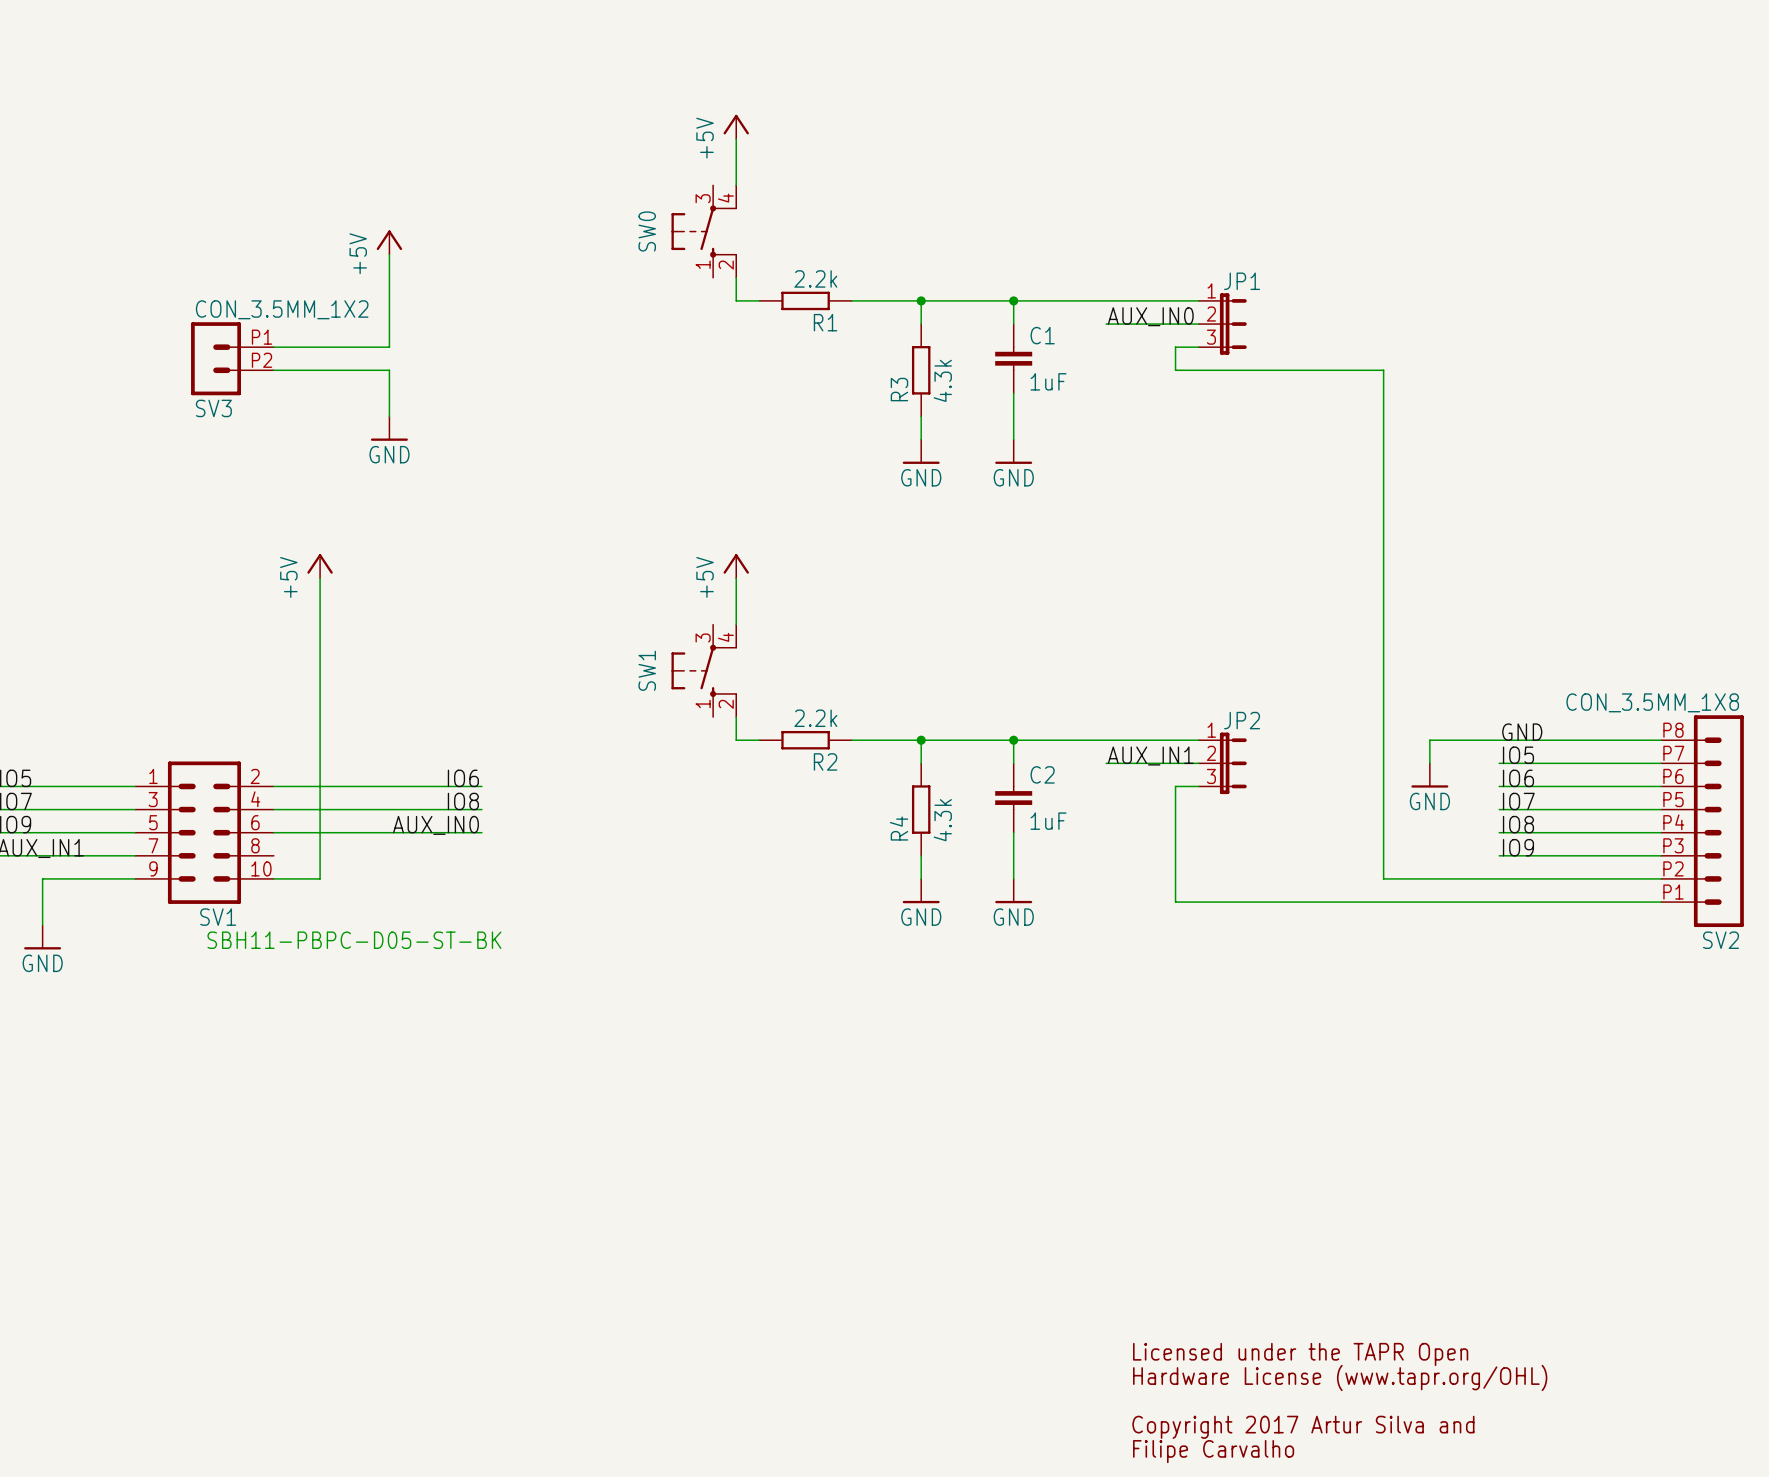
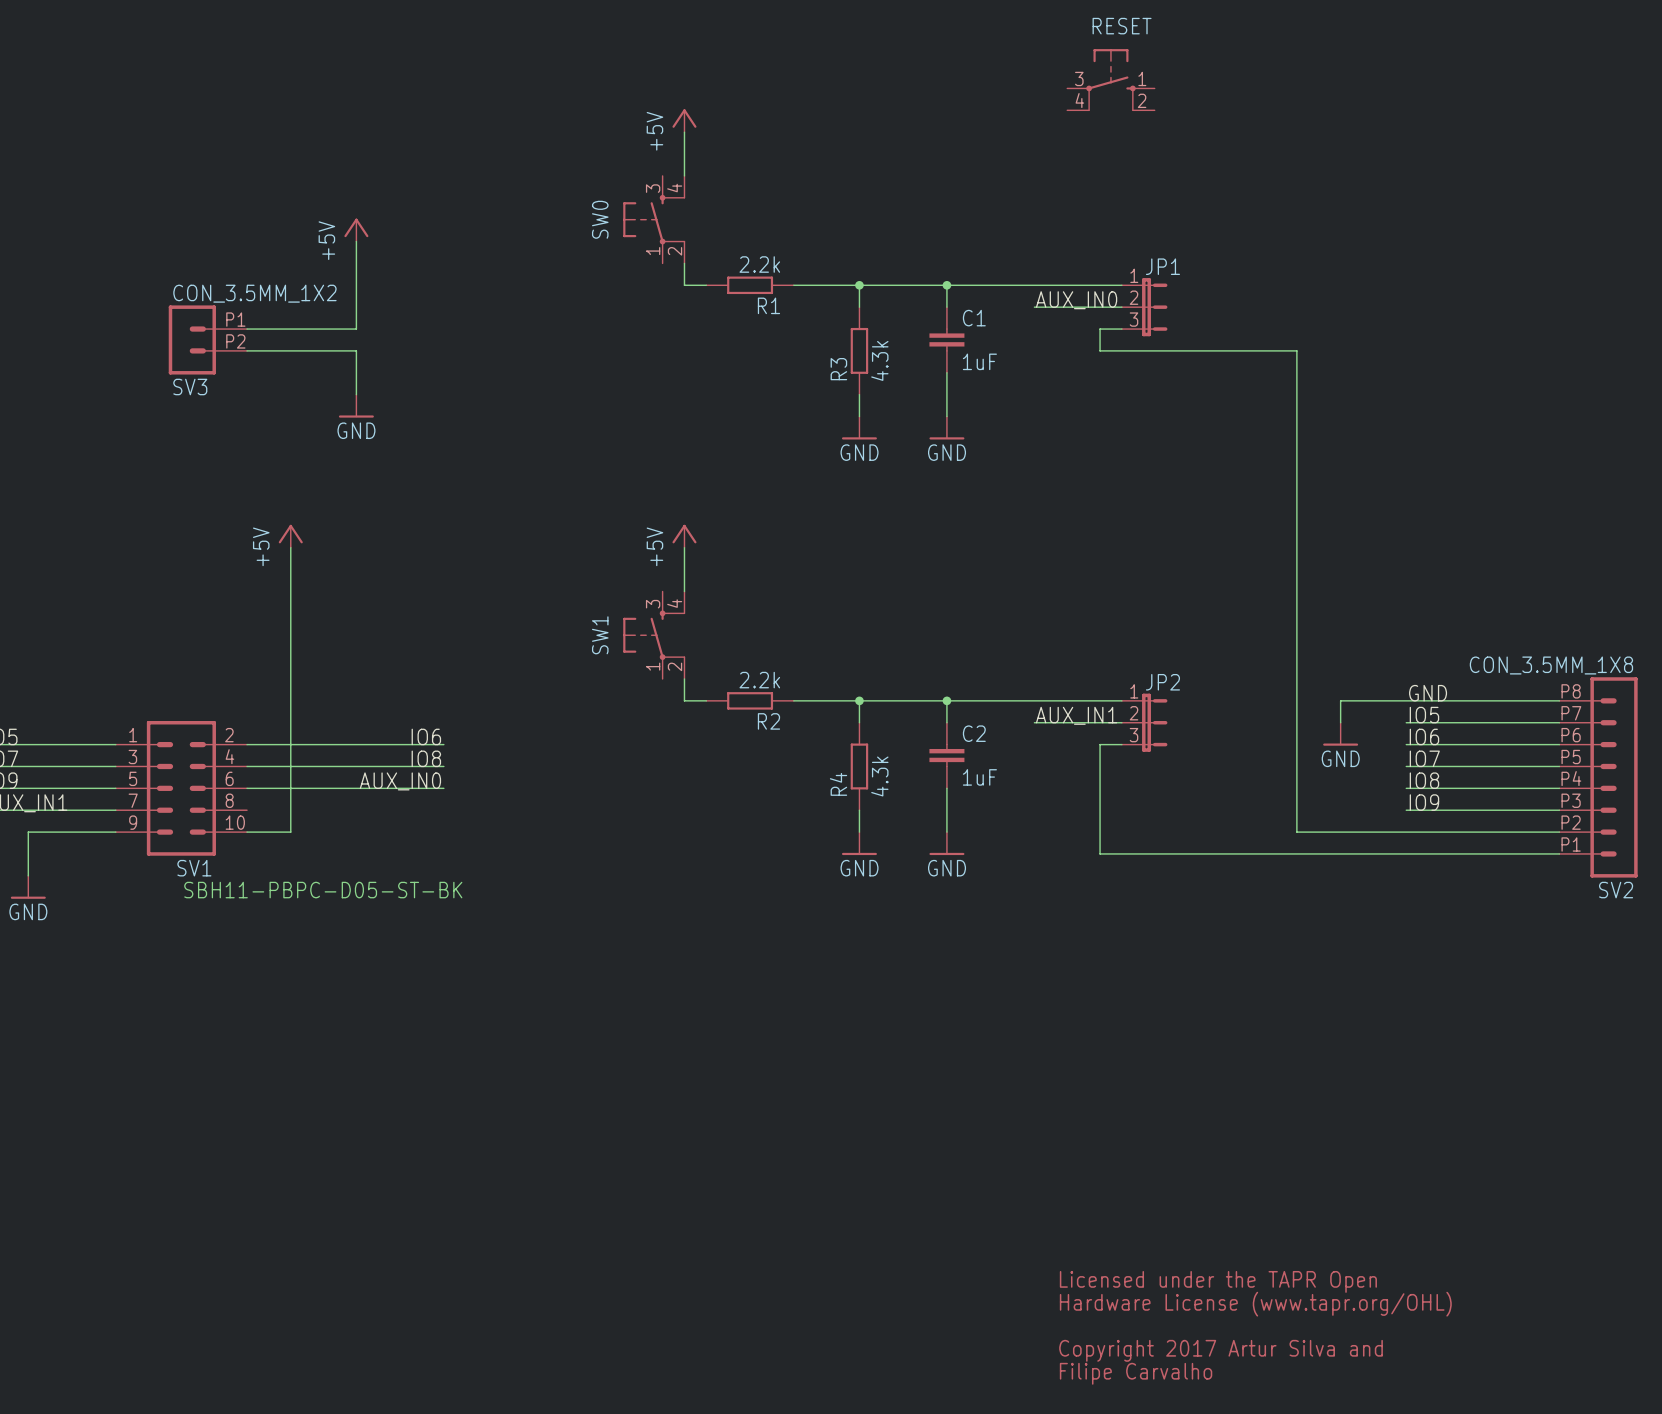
RESET: none -> (1110, 80)
SW0 symbol: [671, 185, 737, 278] -> [623, 175, 686, 264]
SW1 symbol: [671, 624, 737, 718] -> [623, 591, 686, 679]

